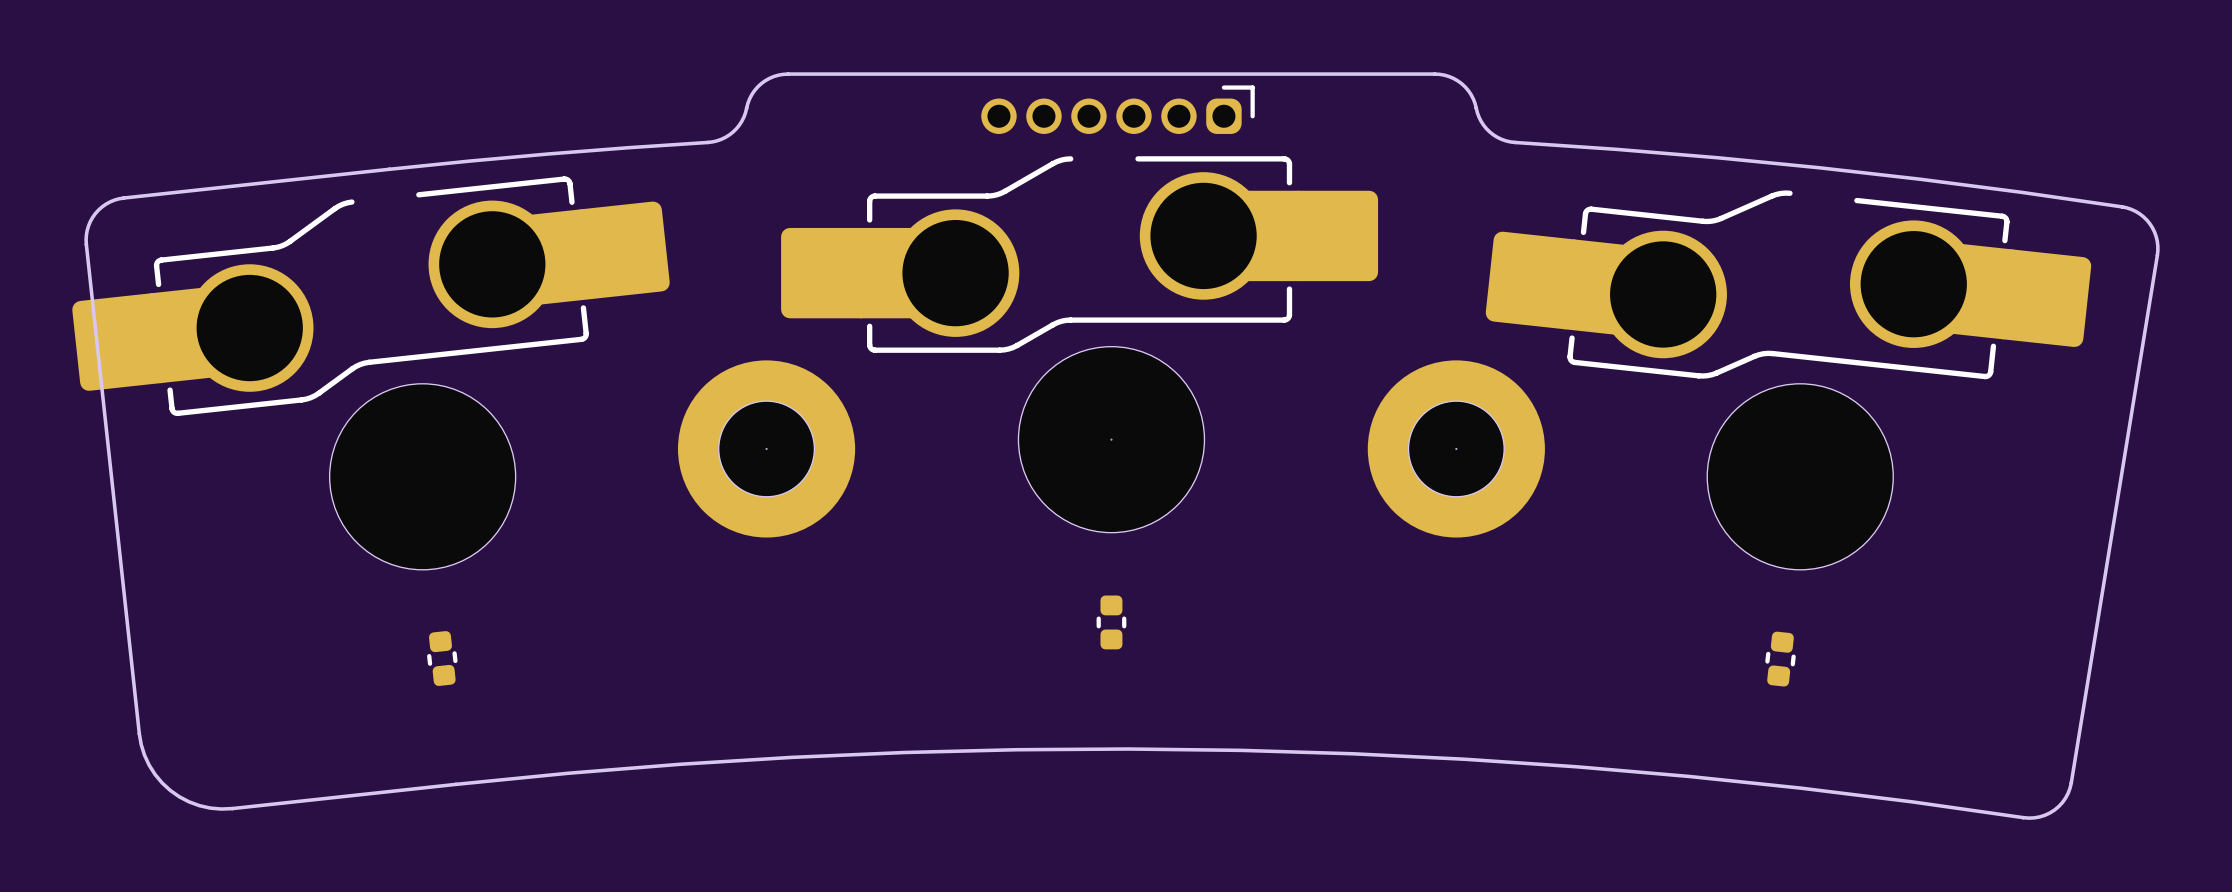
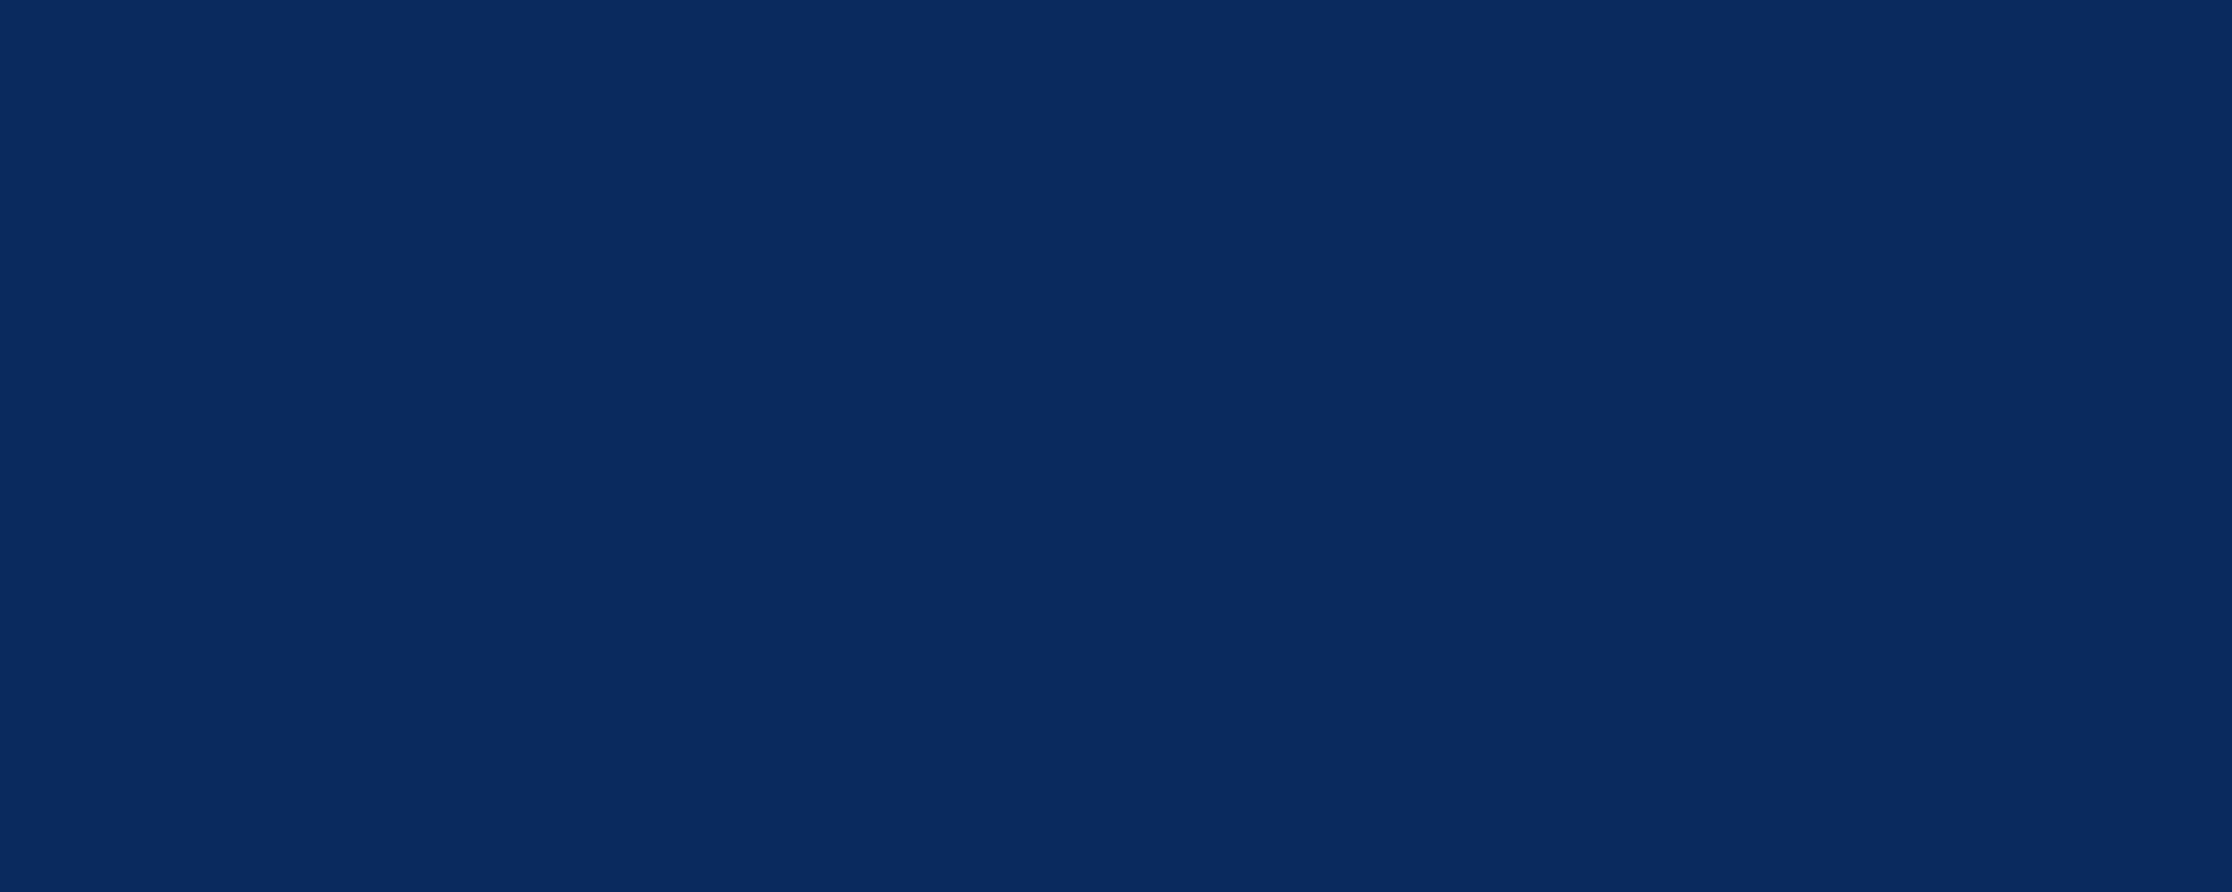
board edge: (1434, 74) (783, 74) (769, 78) (757, 87) (749, 99) (743, 117) (736, 128) (725, 137) (712, 141) (468, 161) (123, 198) (110, 201) (98, 210) (90, 221) (86, 235) (86, 244) (139, 733) (149, 765) (162, 782) (179, 796) (199, 805) (221, 809) (567, 773) (679, 764) (903, 752) (1128, 749) (1352, 753) (1577, 766) (1800, 788) (2028, 818) (2044, 815) (2058, 806) (2065, 798) (2071, 782) (2157, 255) (2156, 236) (2146, 220) (2135, 211) (2122, 206) (1920, 179) (1718, 157) (1510, 141) (1497, 137) (1486, 128) (1479, 117) (1471, 94) (1461, 83) (1449, 76) (1434, 74) -> none
part: (1118, 109) -> none
part: (1079, 344) -> none
part: (371, 373) -> none
part: (1788, 380) -> none
round board edge: [1111, 439, 1112, 441] -> none
part: (766, 448) -> none
round board edge: [766, 448, 767, 450] -> none
part: (1456, 448) -> none
round board edge: [1456, 448, 1457, 450] -> none
part: (1111, 622) -> none
part: (442, 658) -> none
part: (1780, 659) -> none

